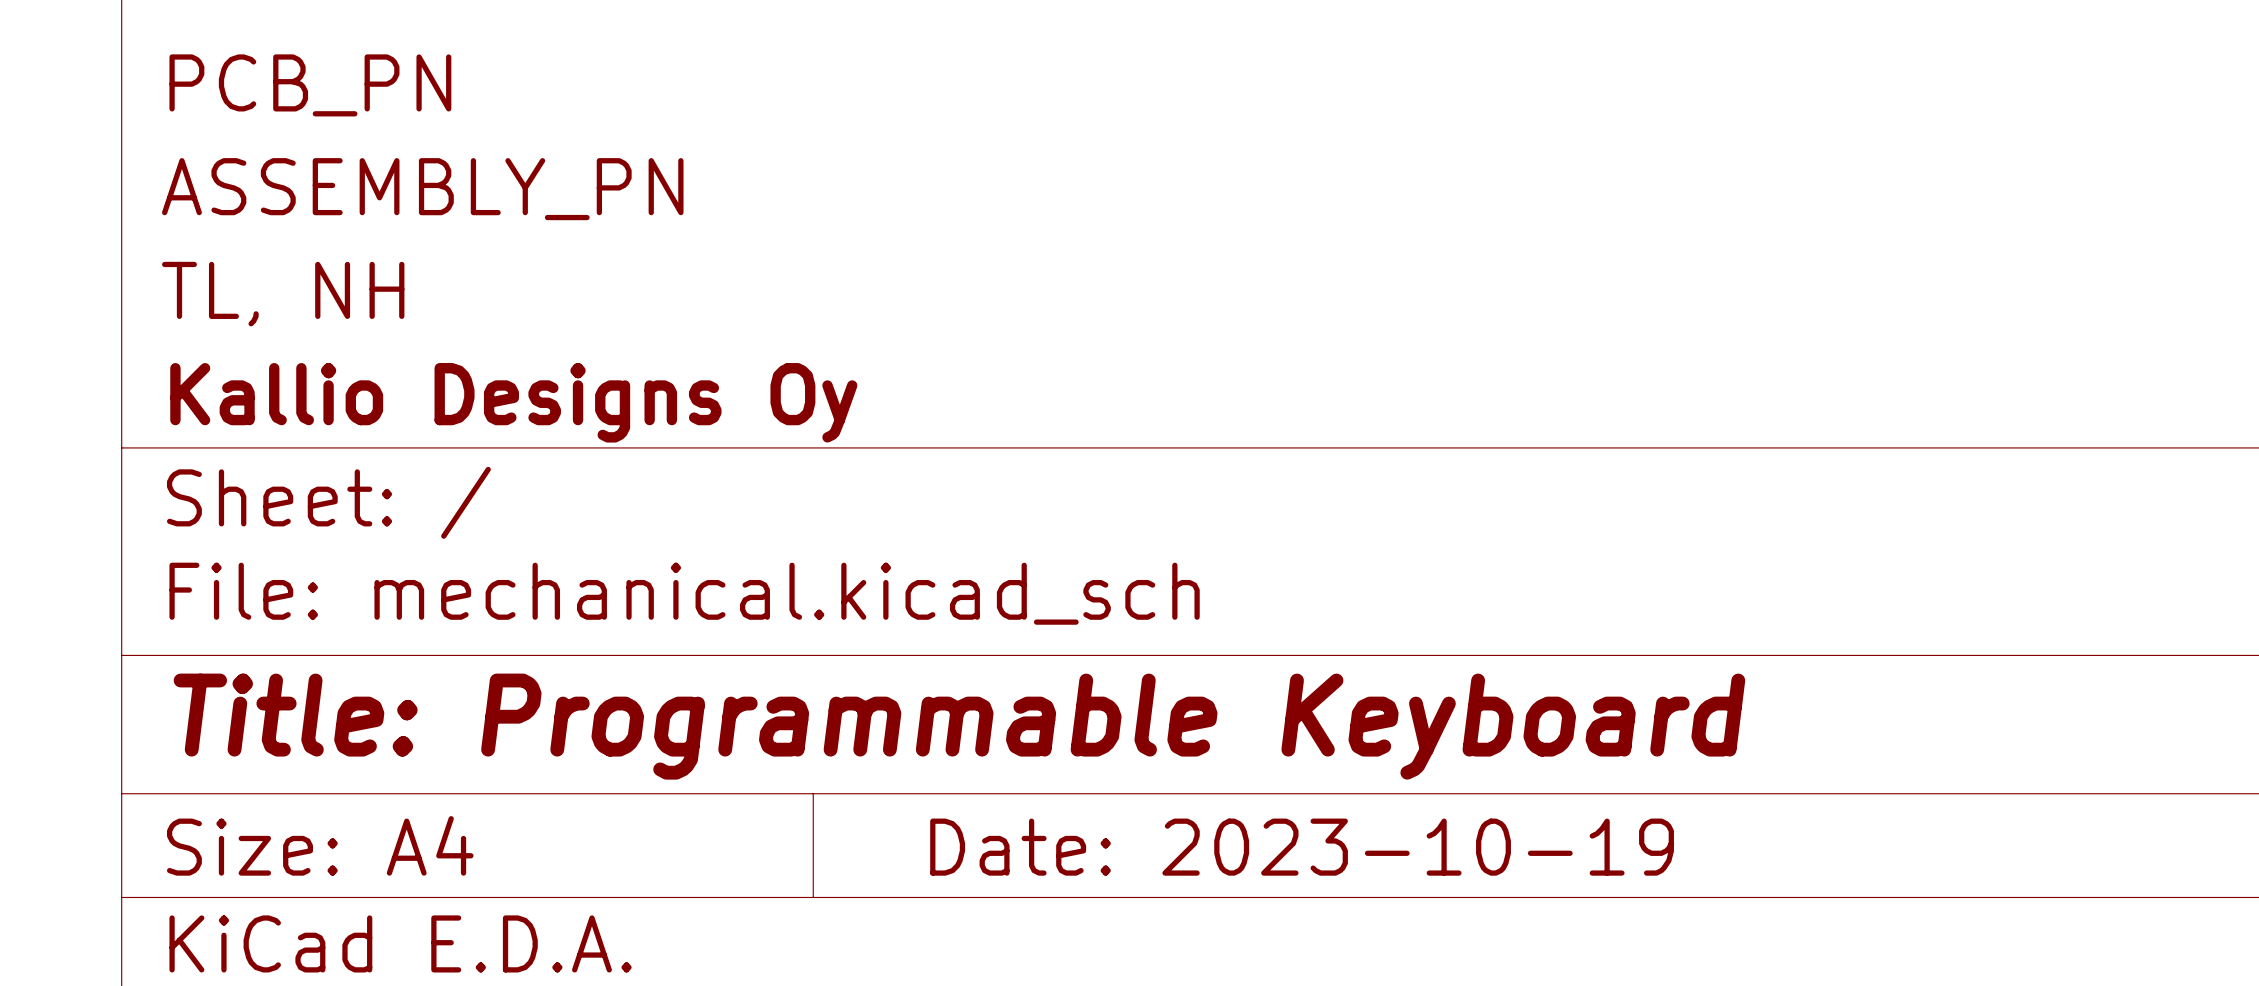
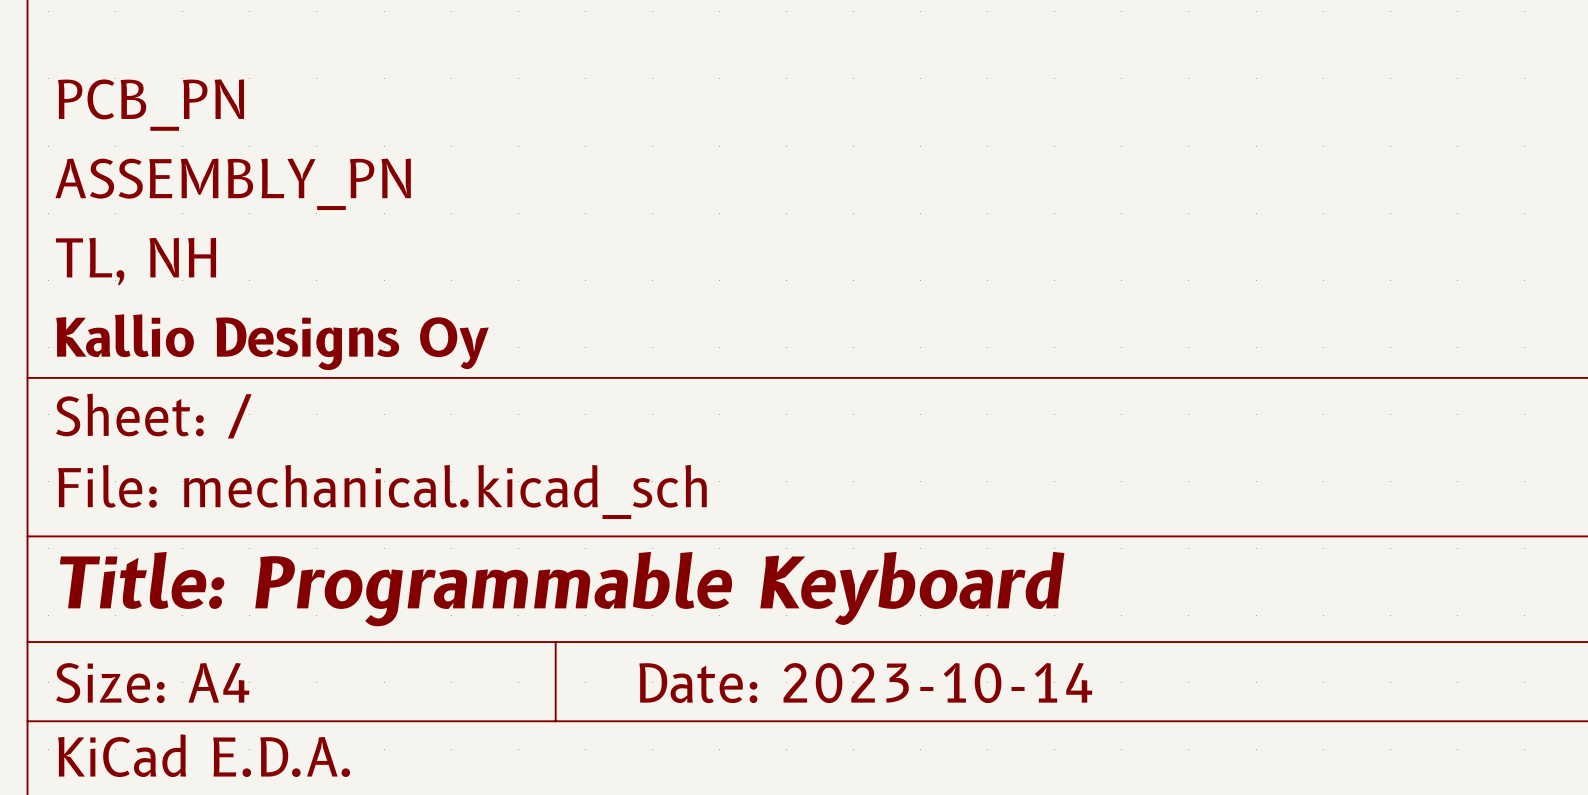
title block: Date: 2023-10-19 (1302, 847) -> Date: 2023-10-14 (865, 683)

